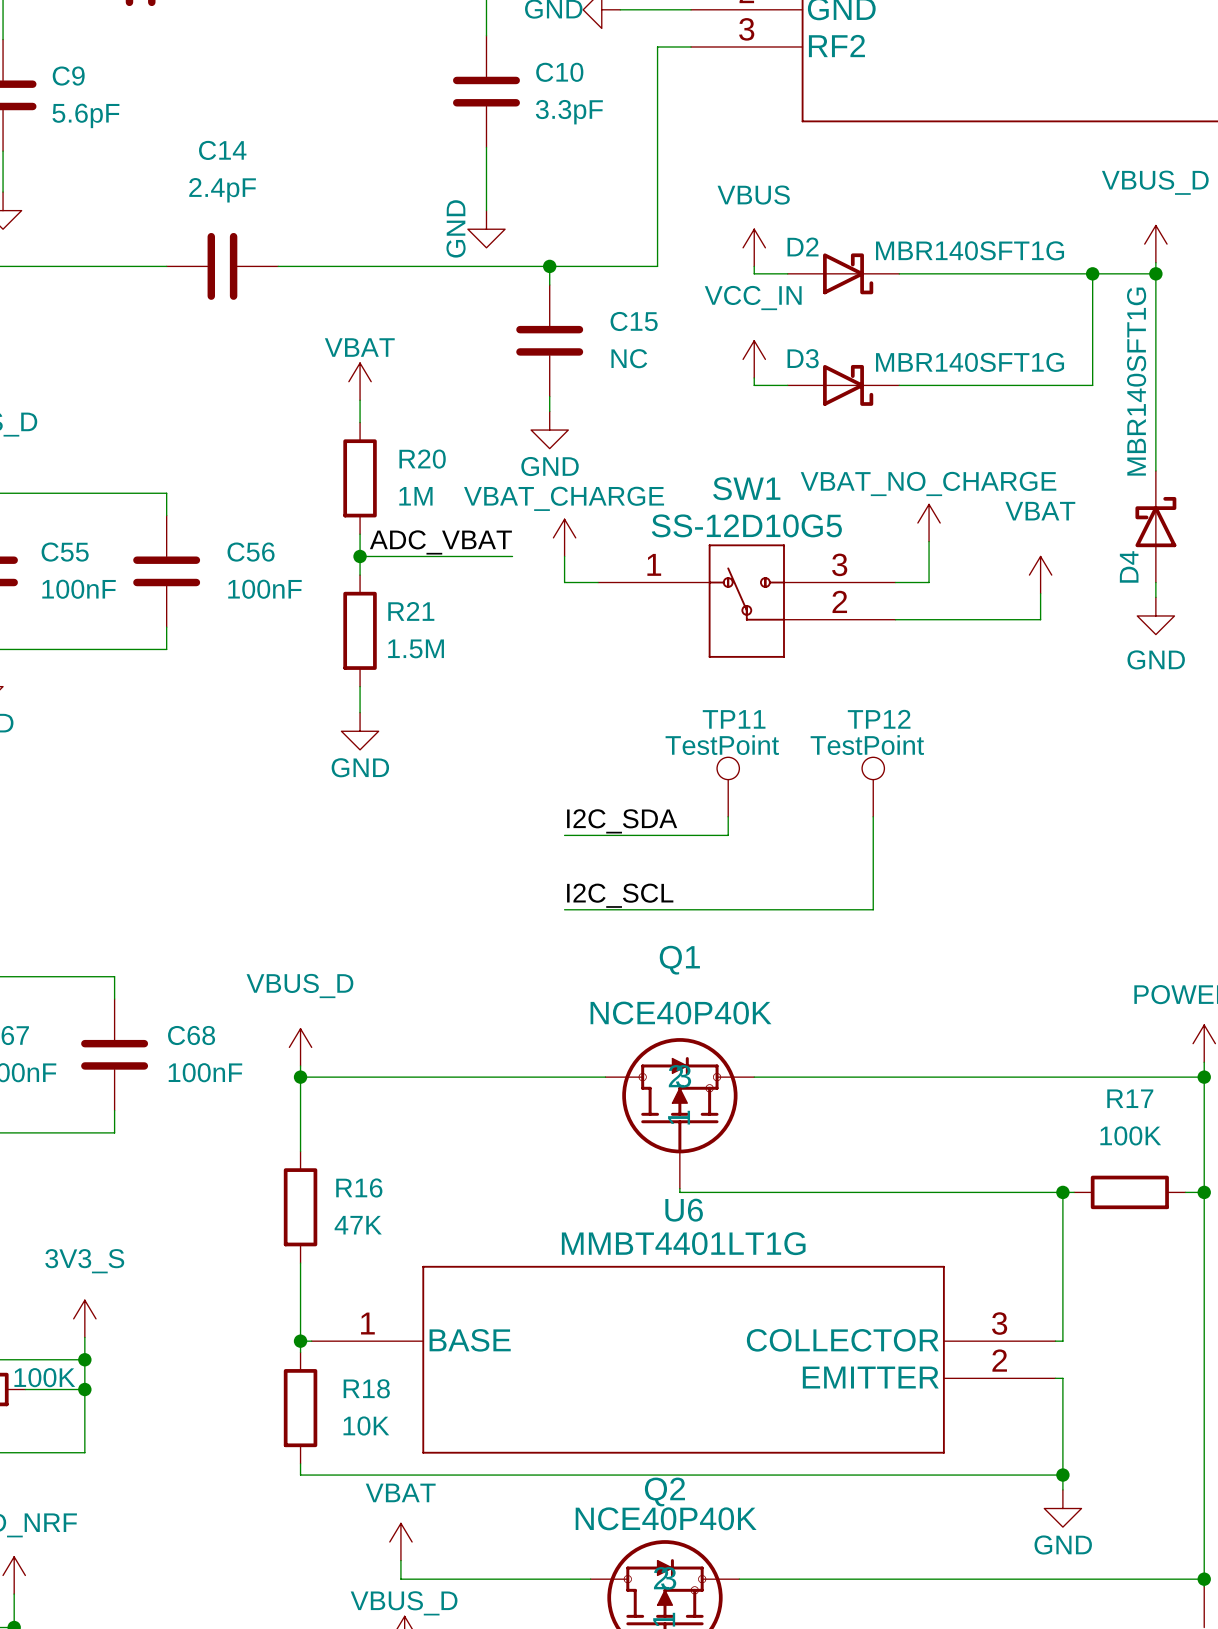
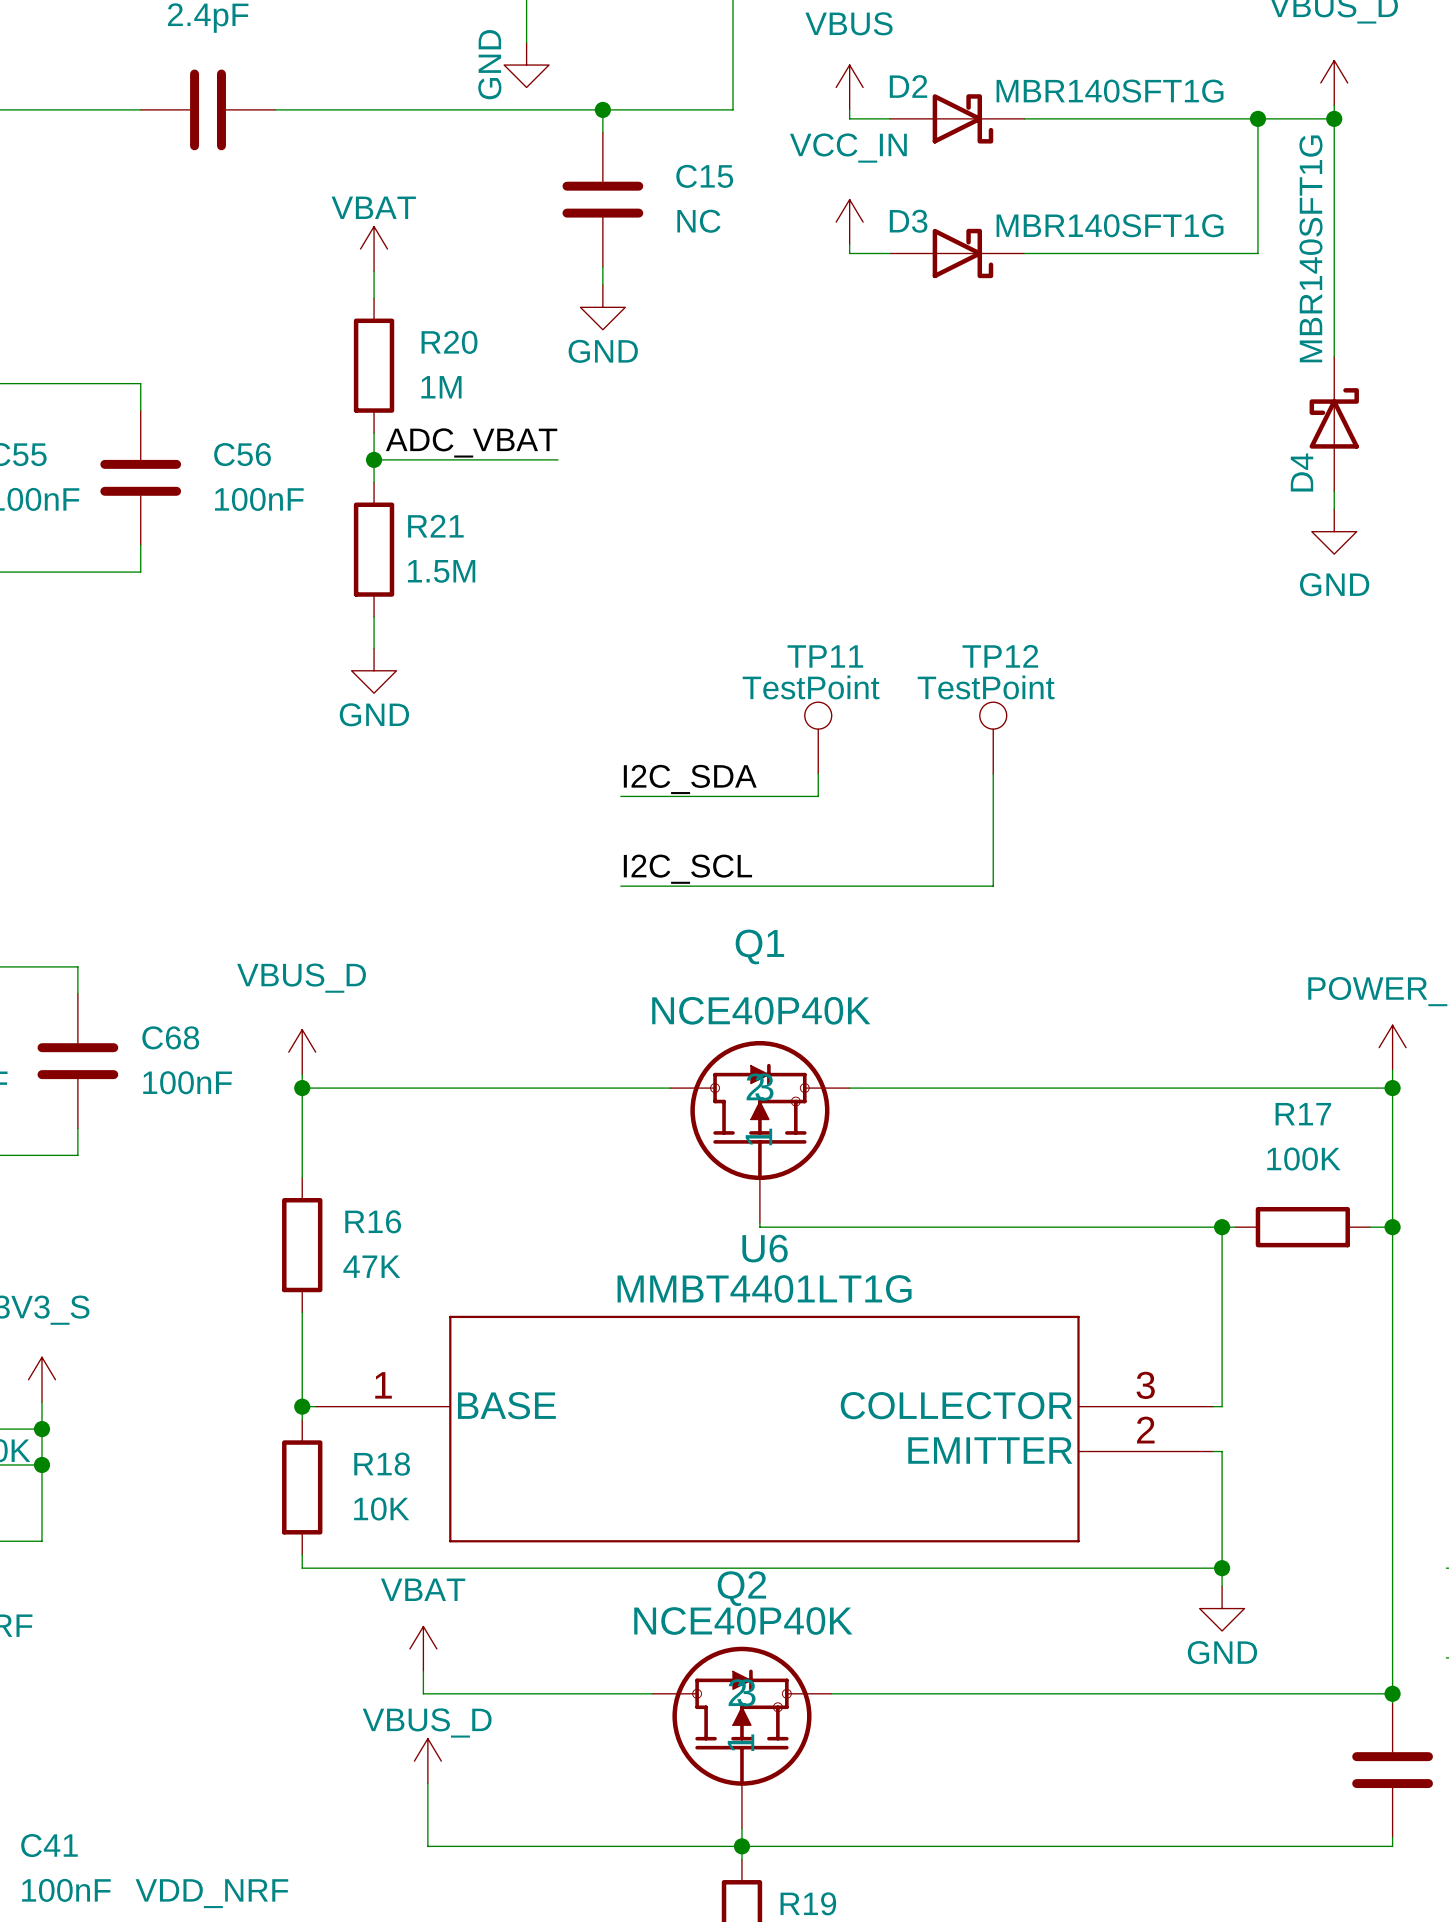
power symbol: VBAT_NO_CHARGE (929, 523) -> none
power symbol: VBAT_CHARGE (564, 537) -> none
wire: (929, 541) (929, 582) (895, 582) -> none
wire: (564, 556) (564, 582) (598, 582) -> none
power symbol: VBAT (1040, 575) -> none
wire: (1040, 593) (1040, 619) (895, 619) -> none
SW1: SS-12D10G5 (746, 601) -> none

